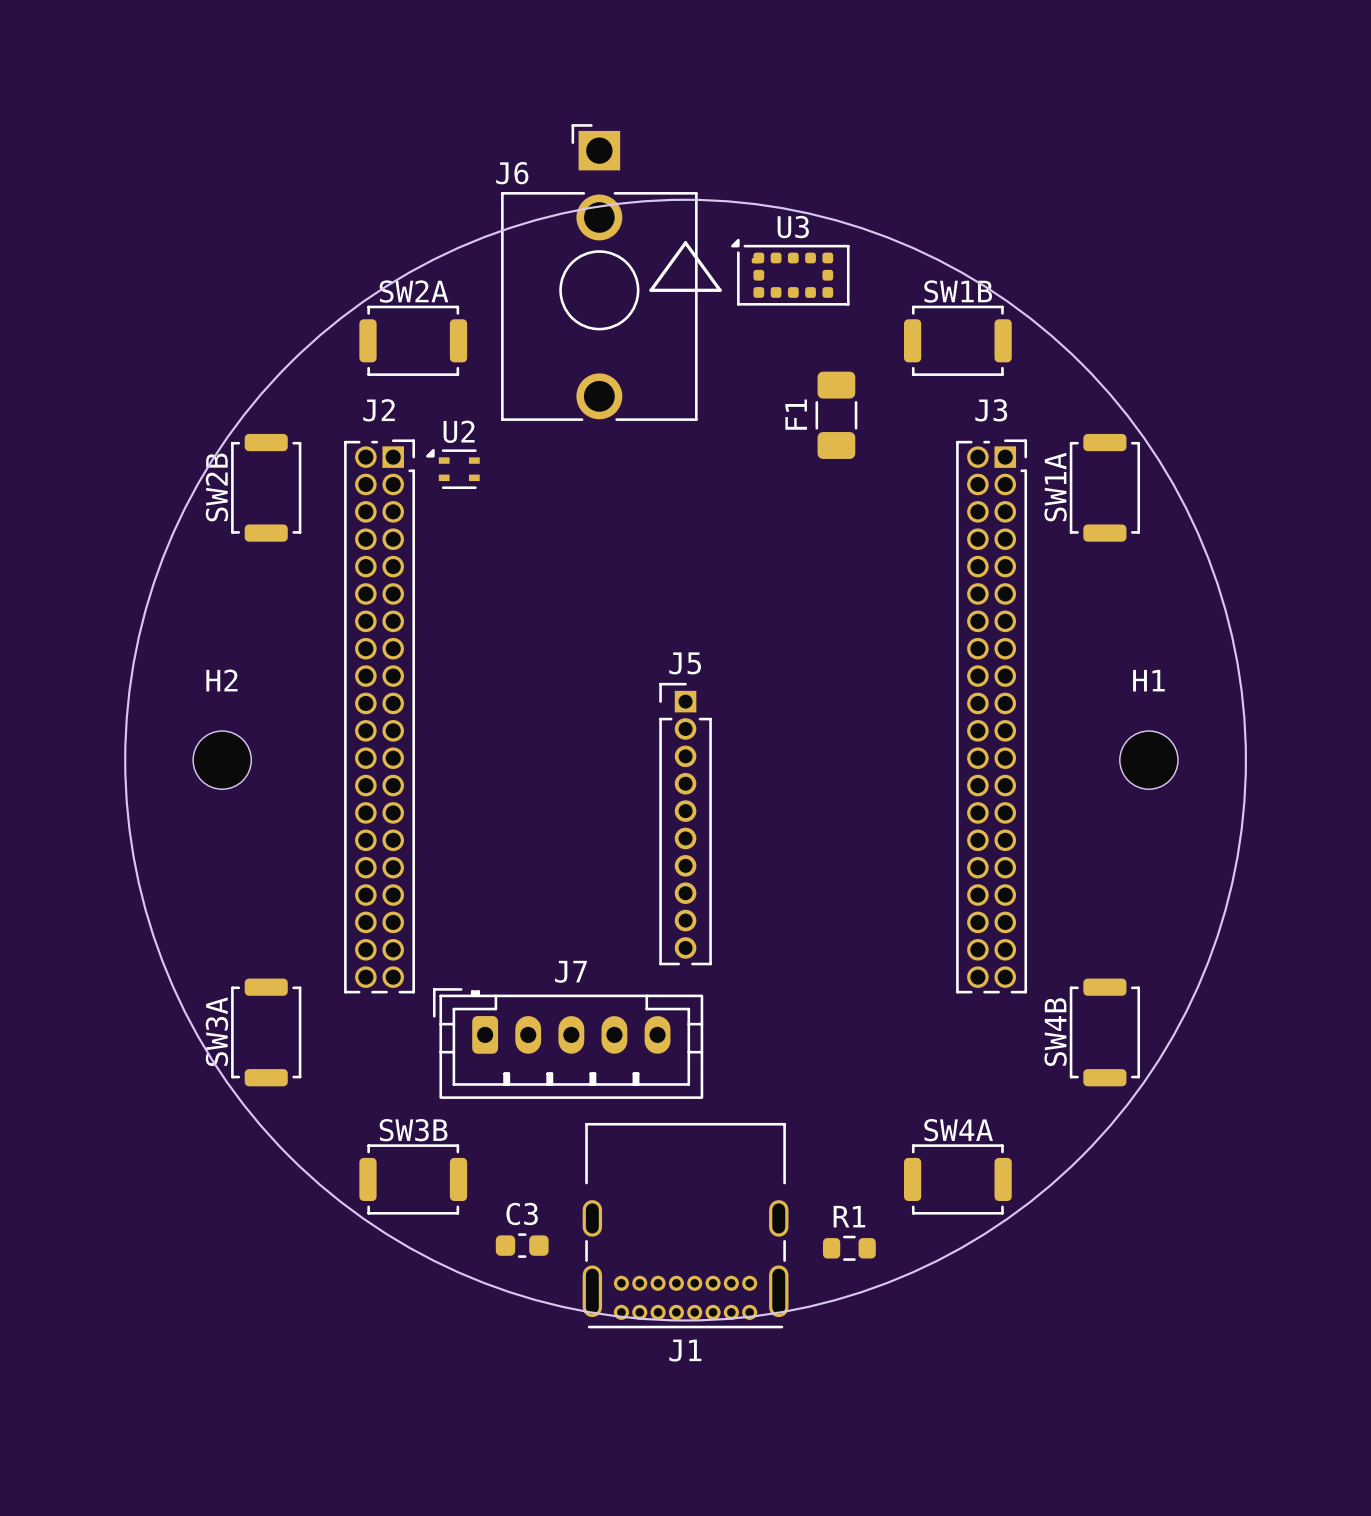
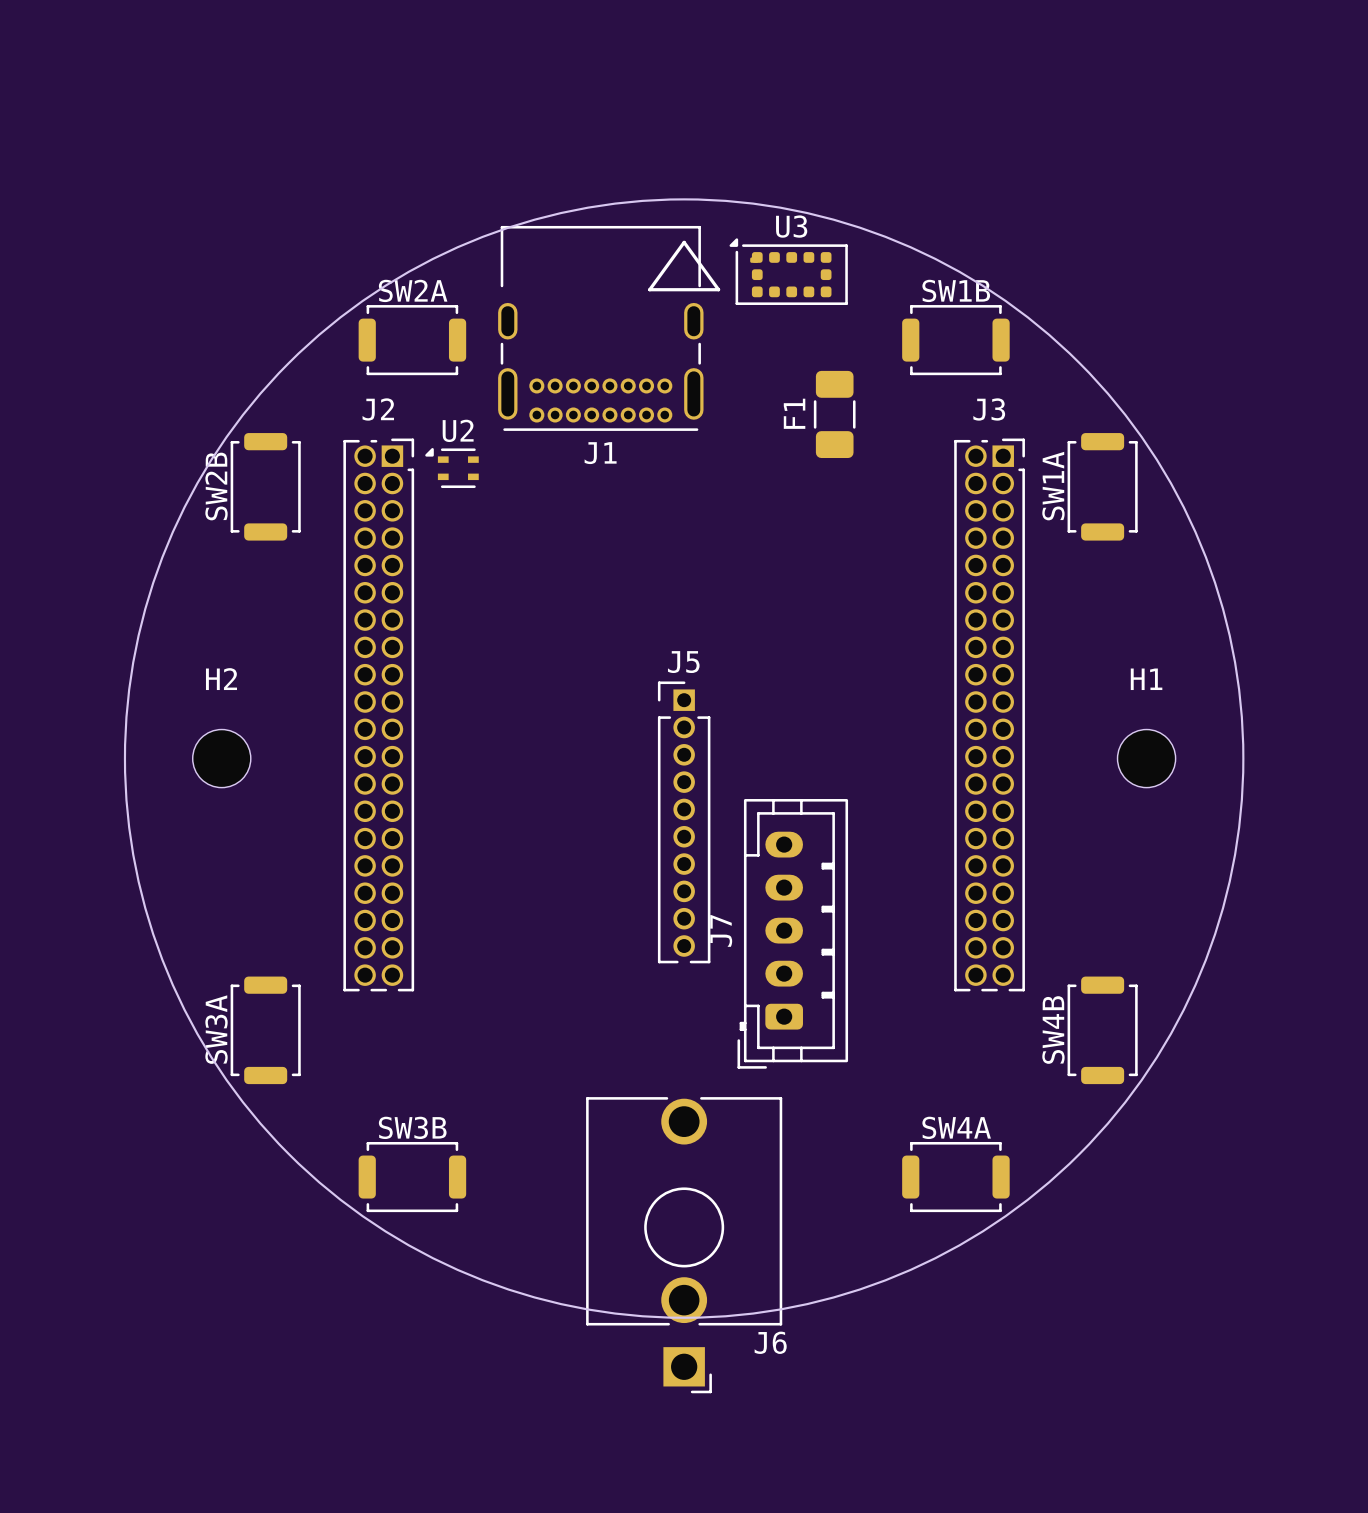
J6 rotation: 0° (599, 272) -> 180° (684, 1245)
J6 position: (599, 272) -> (684, 1245)
J7 rotation: 0° (568, 1043) -> 90° counterclockwise (792, 933)
J7 position: (568, 1043) -> (792, 933)
J1 position: (685, 1225) -> (600, 328)
C3: (522, 1245) -> none
R1: (849, 1248) -> none

